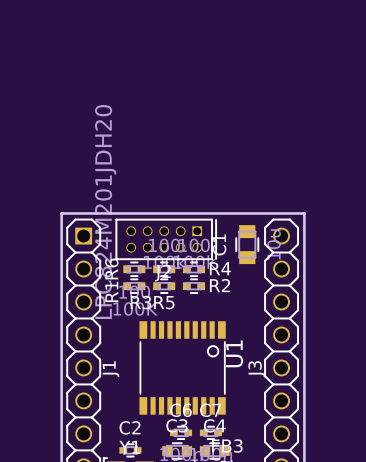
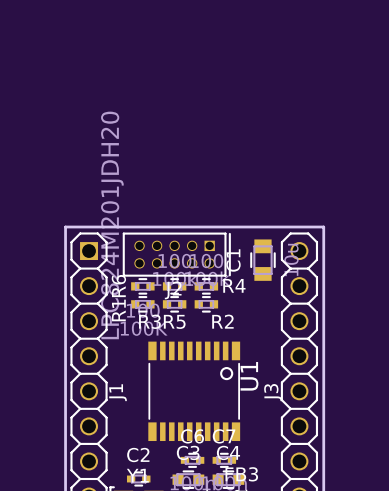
R2 name position: R2 (220, 285) -> R2 (222, 321)

